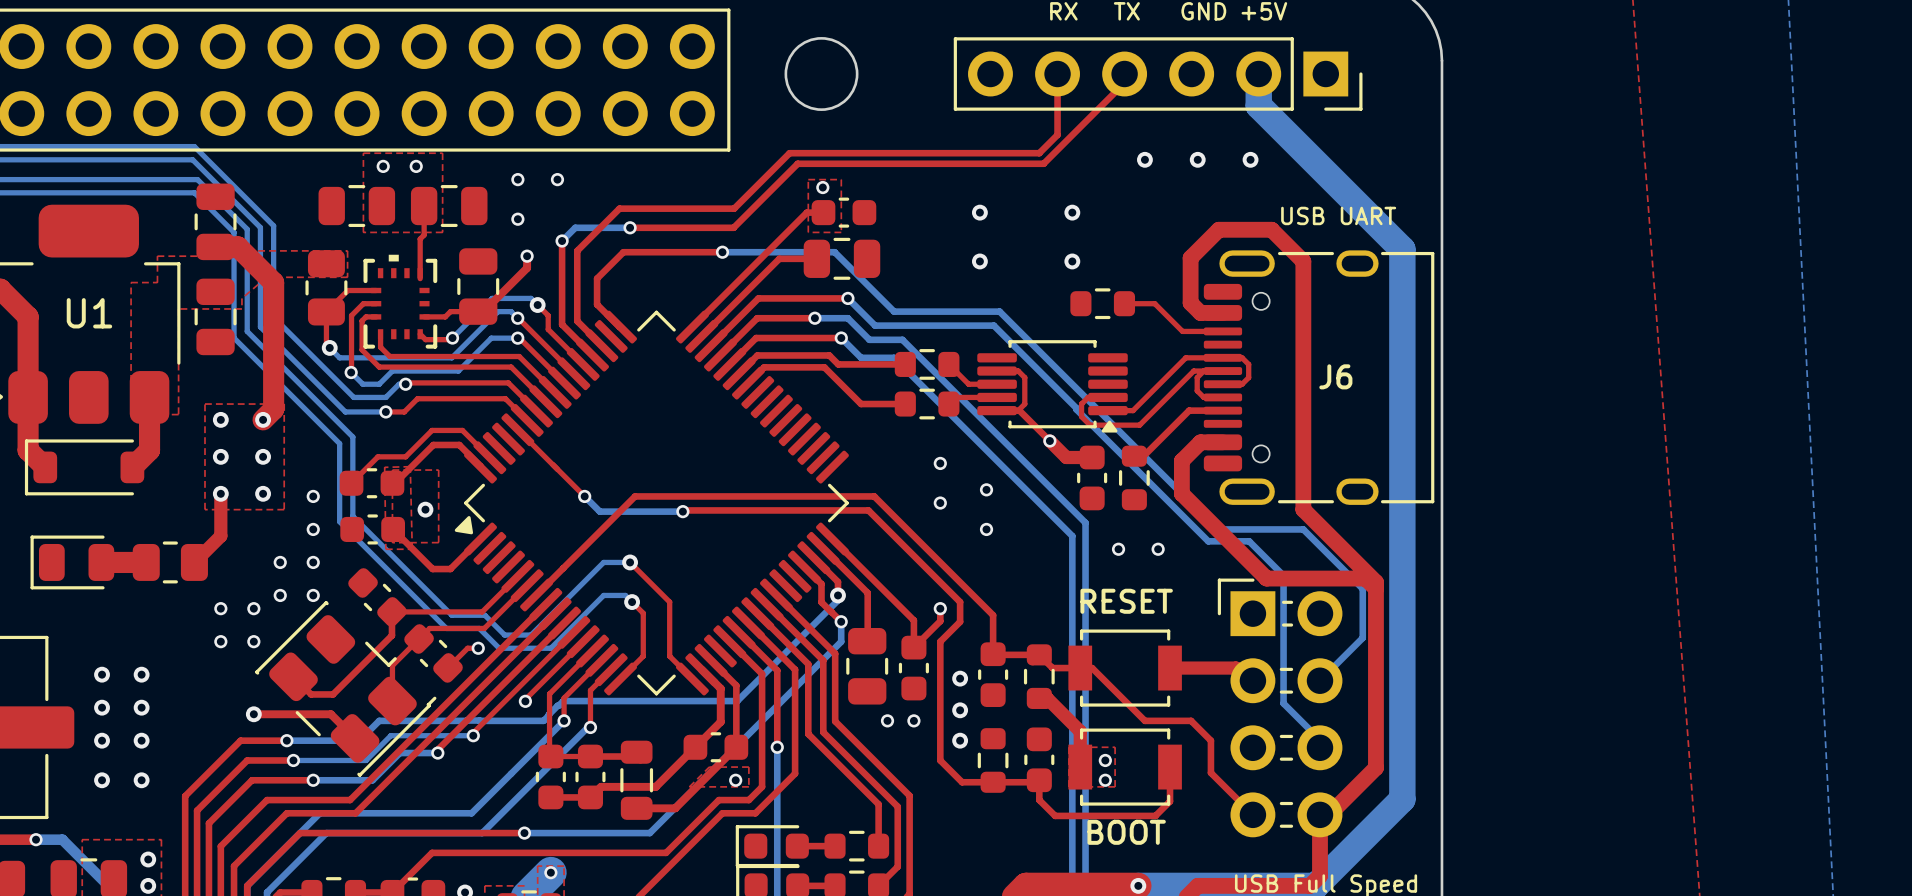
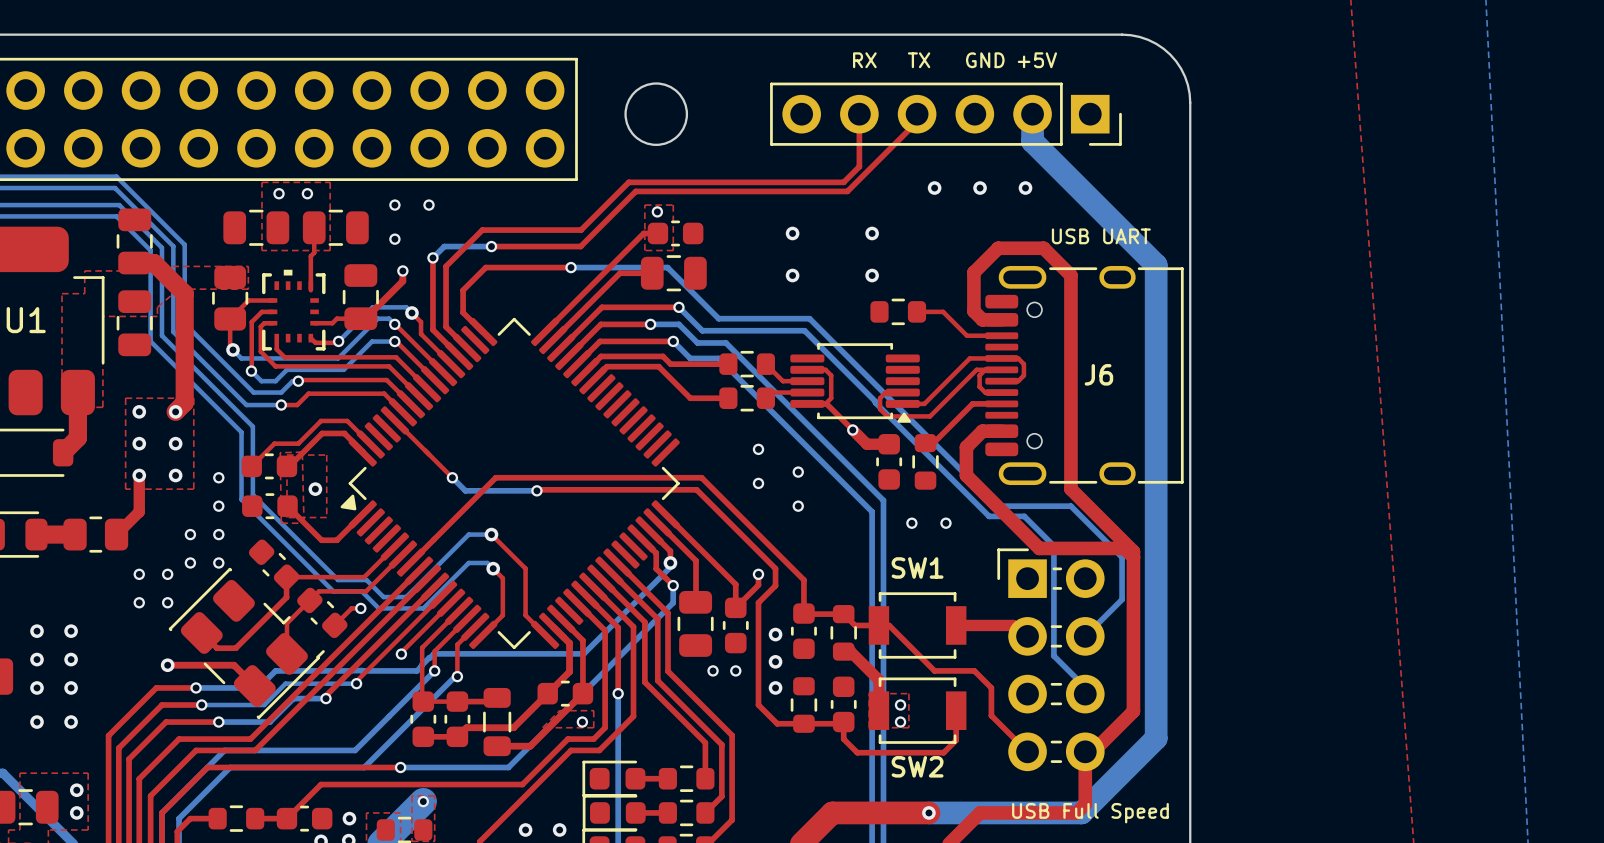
RESET name: RESET (1126, 601) -> SW1 (917, 567)
BOOT name: BOOT (1126, 832) -> SW2 (917, 766)

